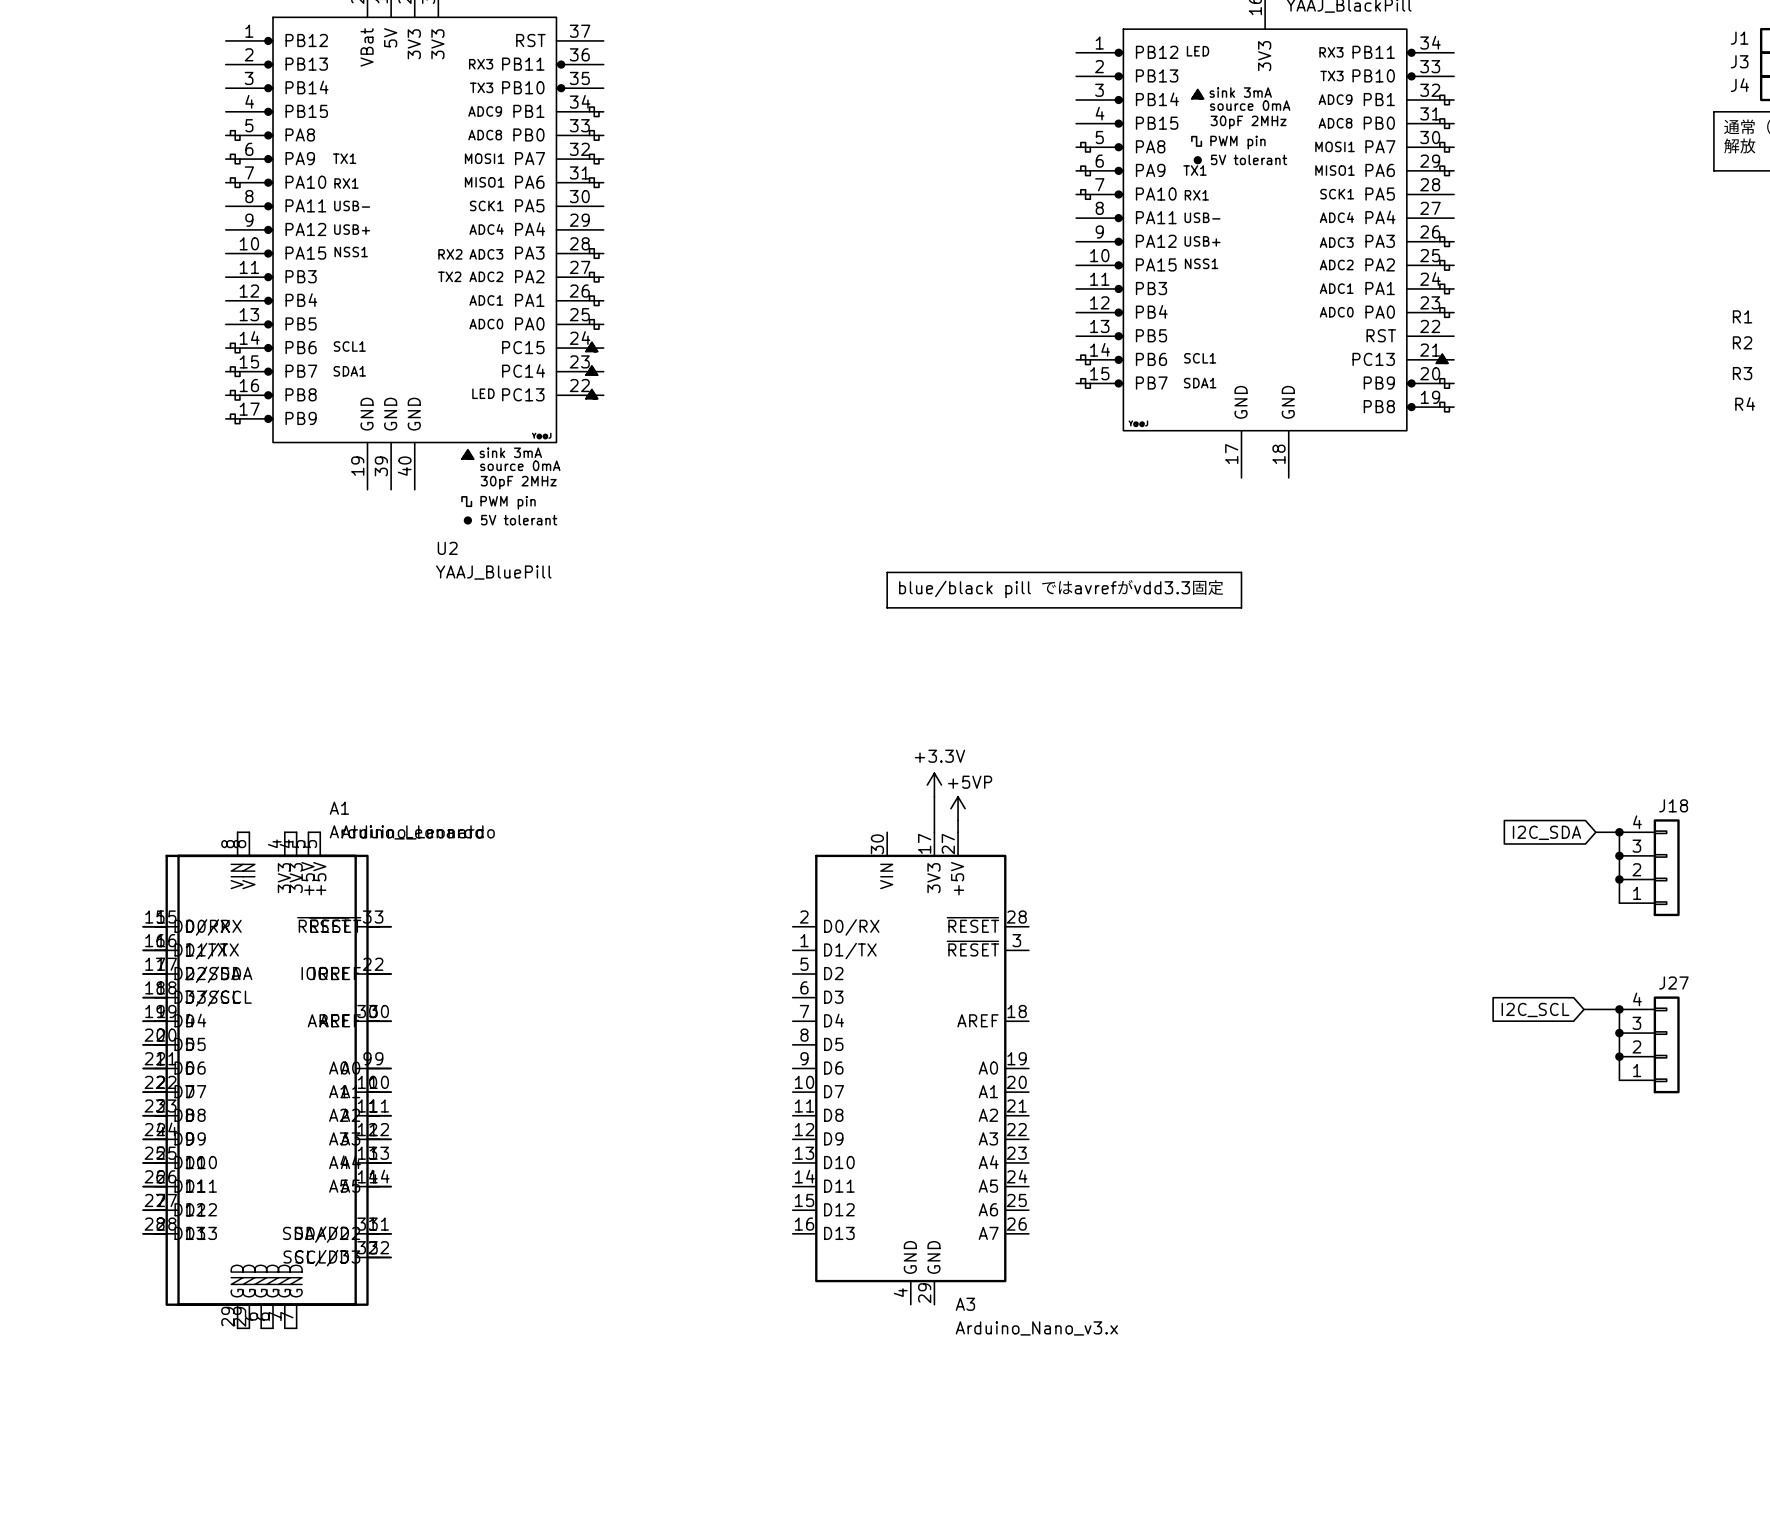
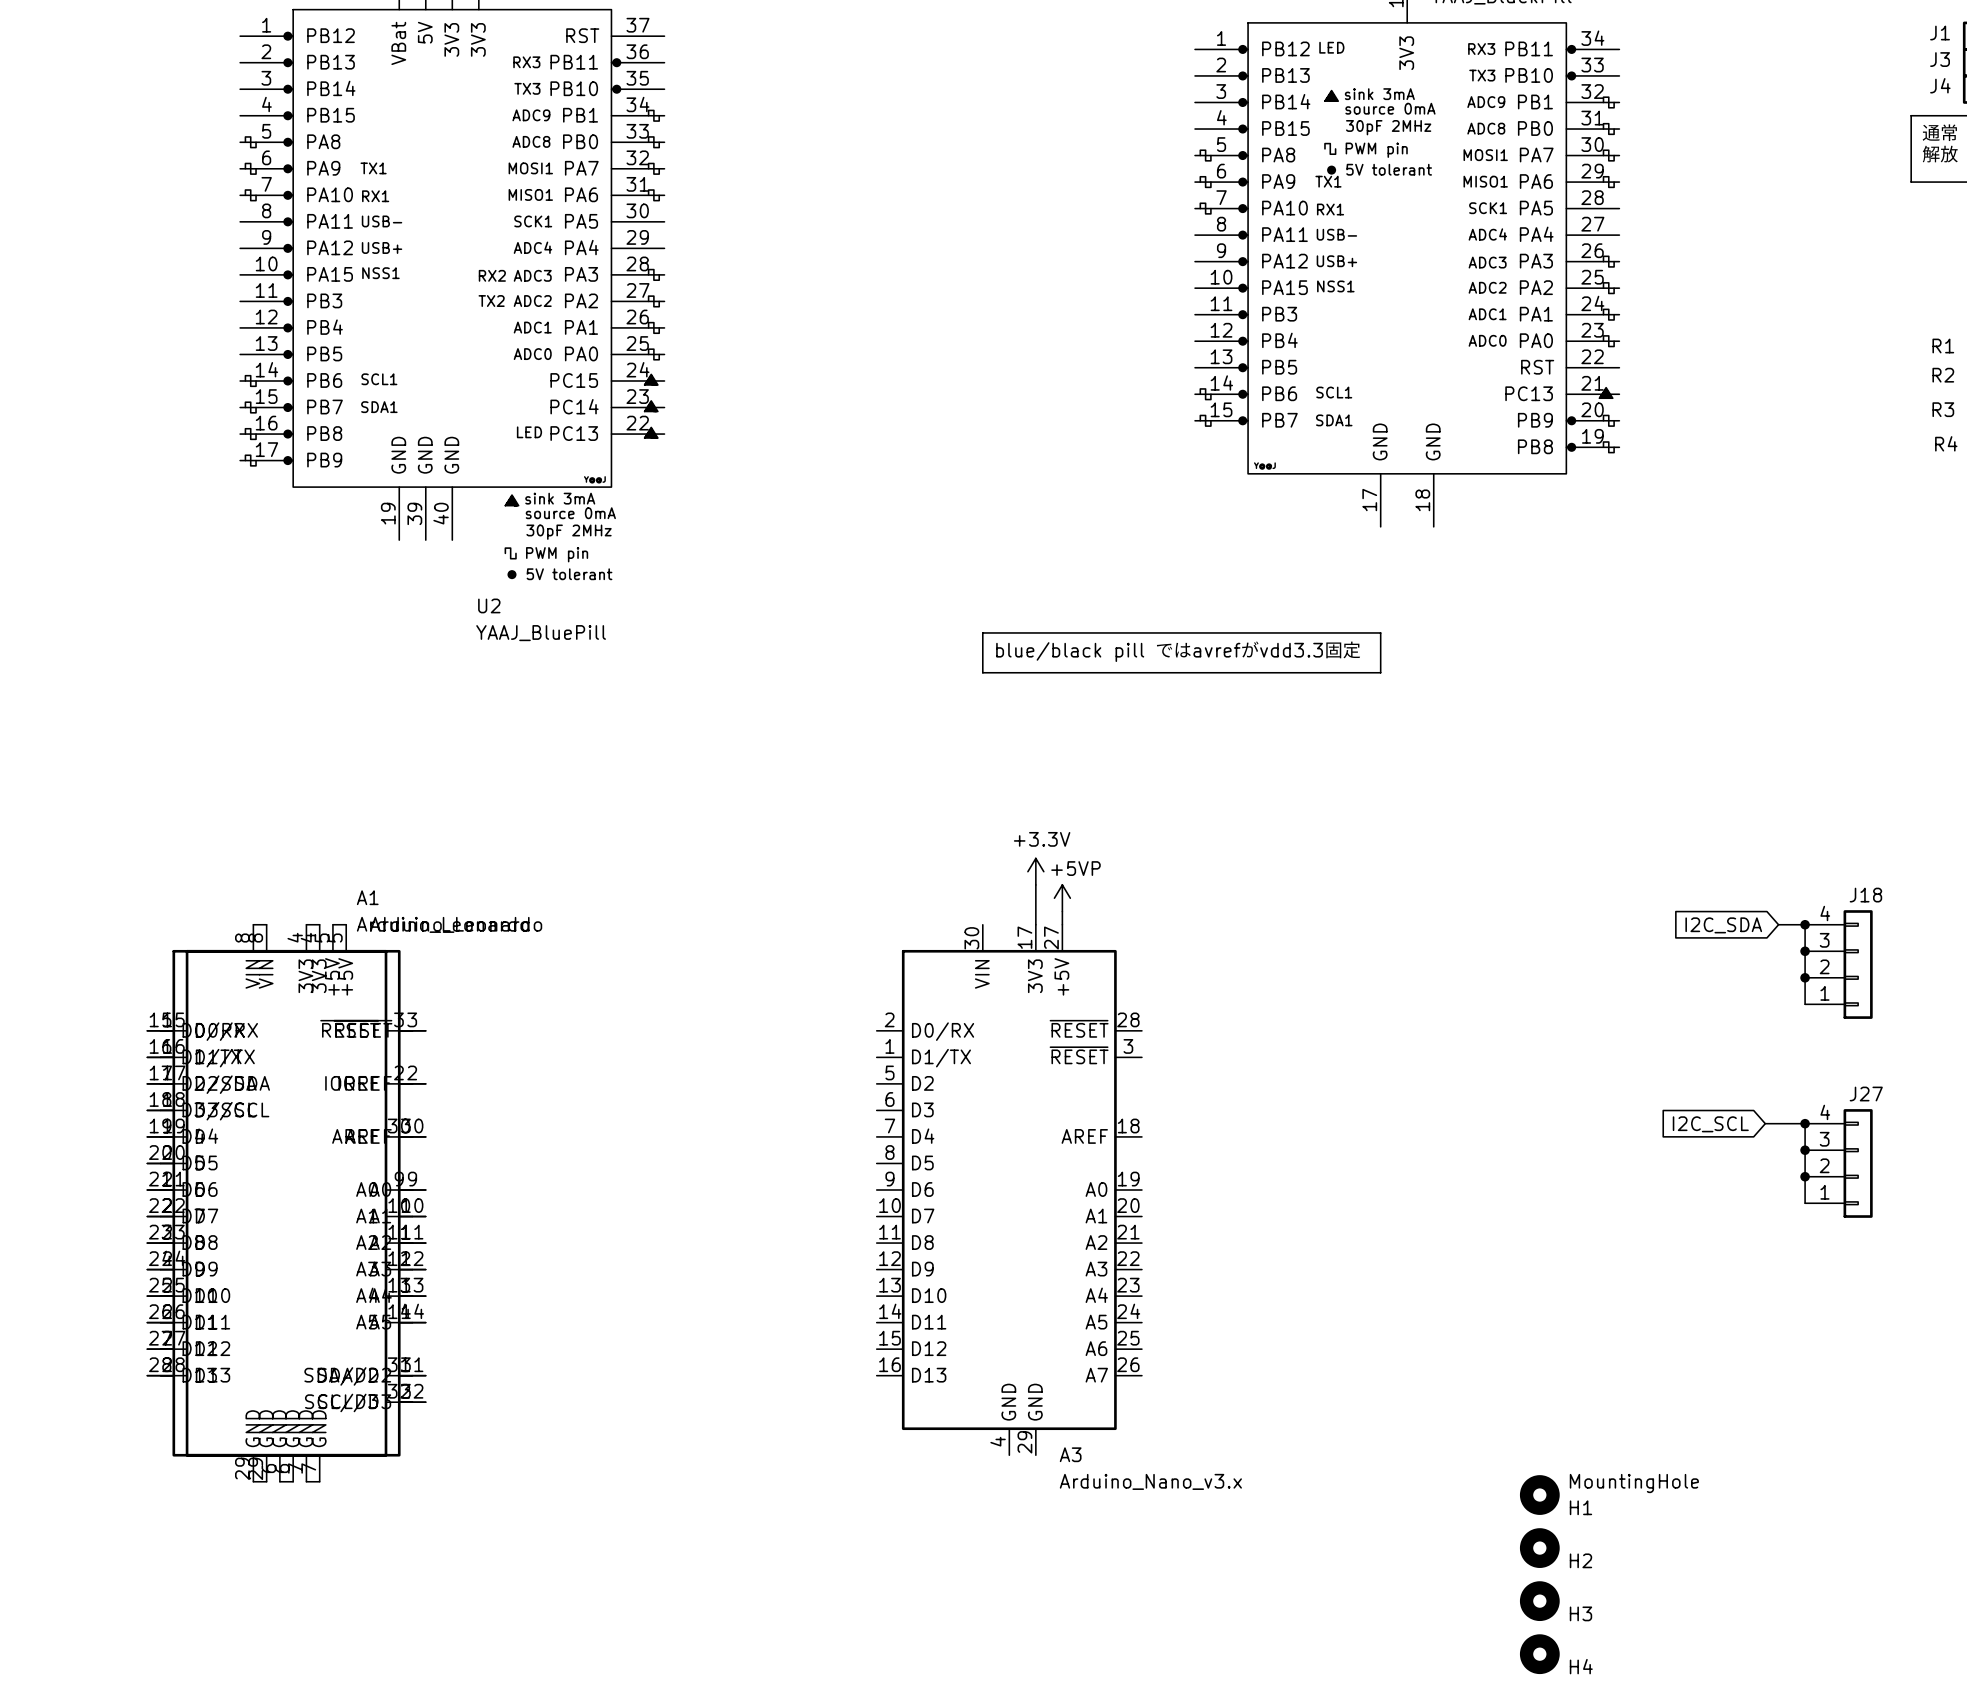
H1: none -> MountingHole (1539, 1495)
H2: none -> (1539, 1548)
H3: none -> (1539, 1601)
H4: none -> (1539, 1654)

